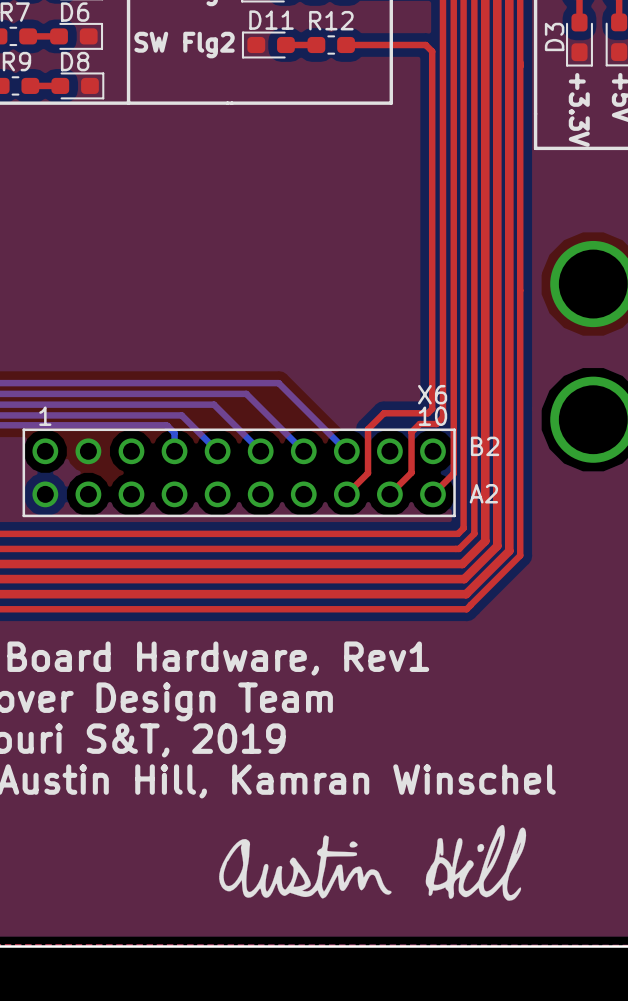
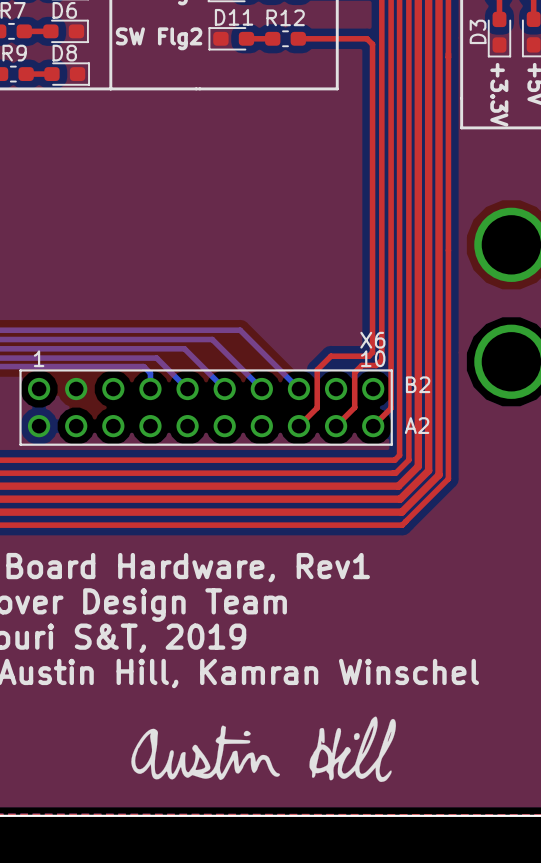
drawing position: (372, 862) -> (263, 749)

